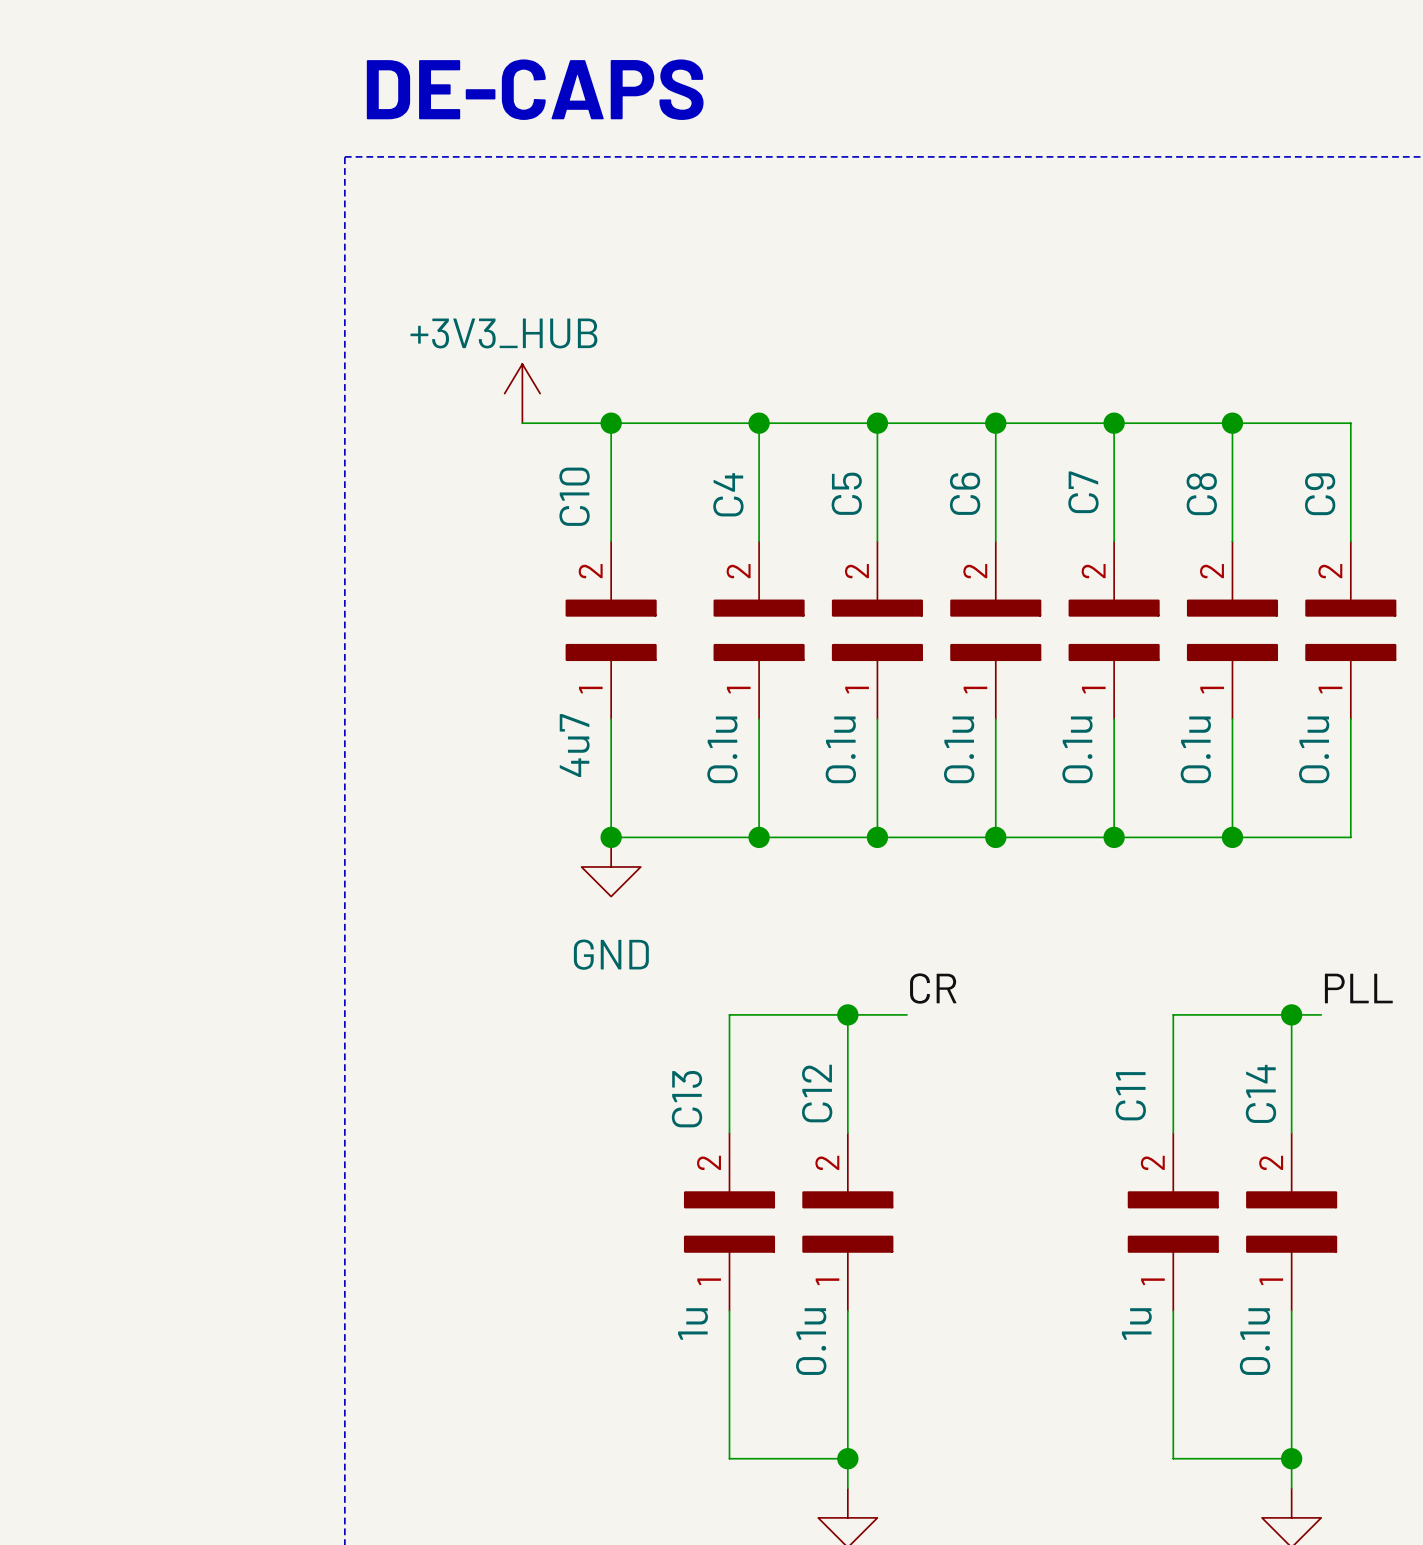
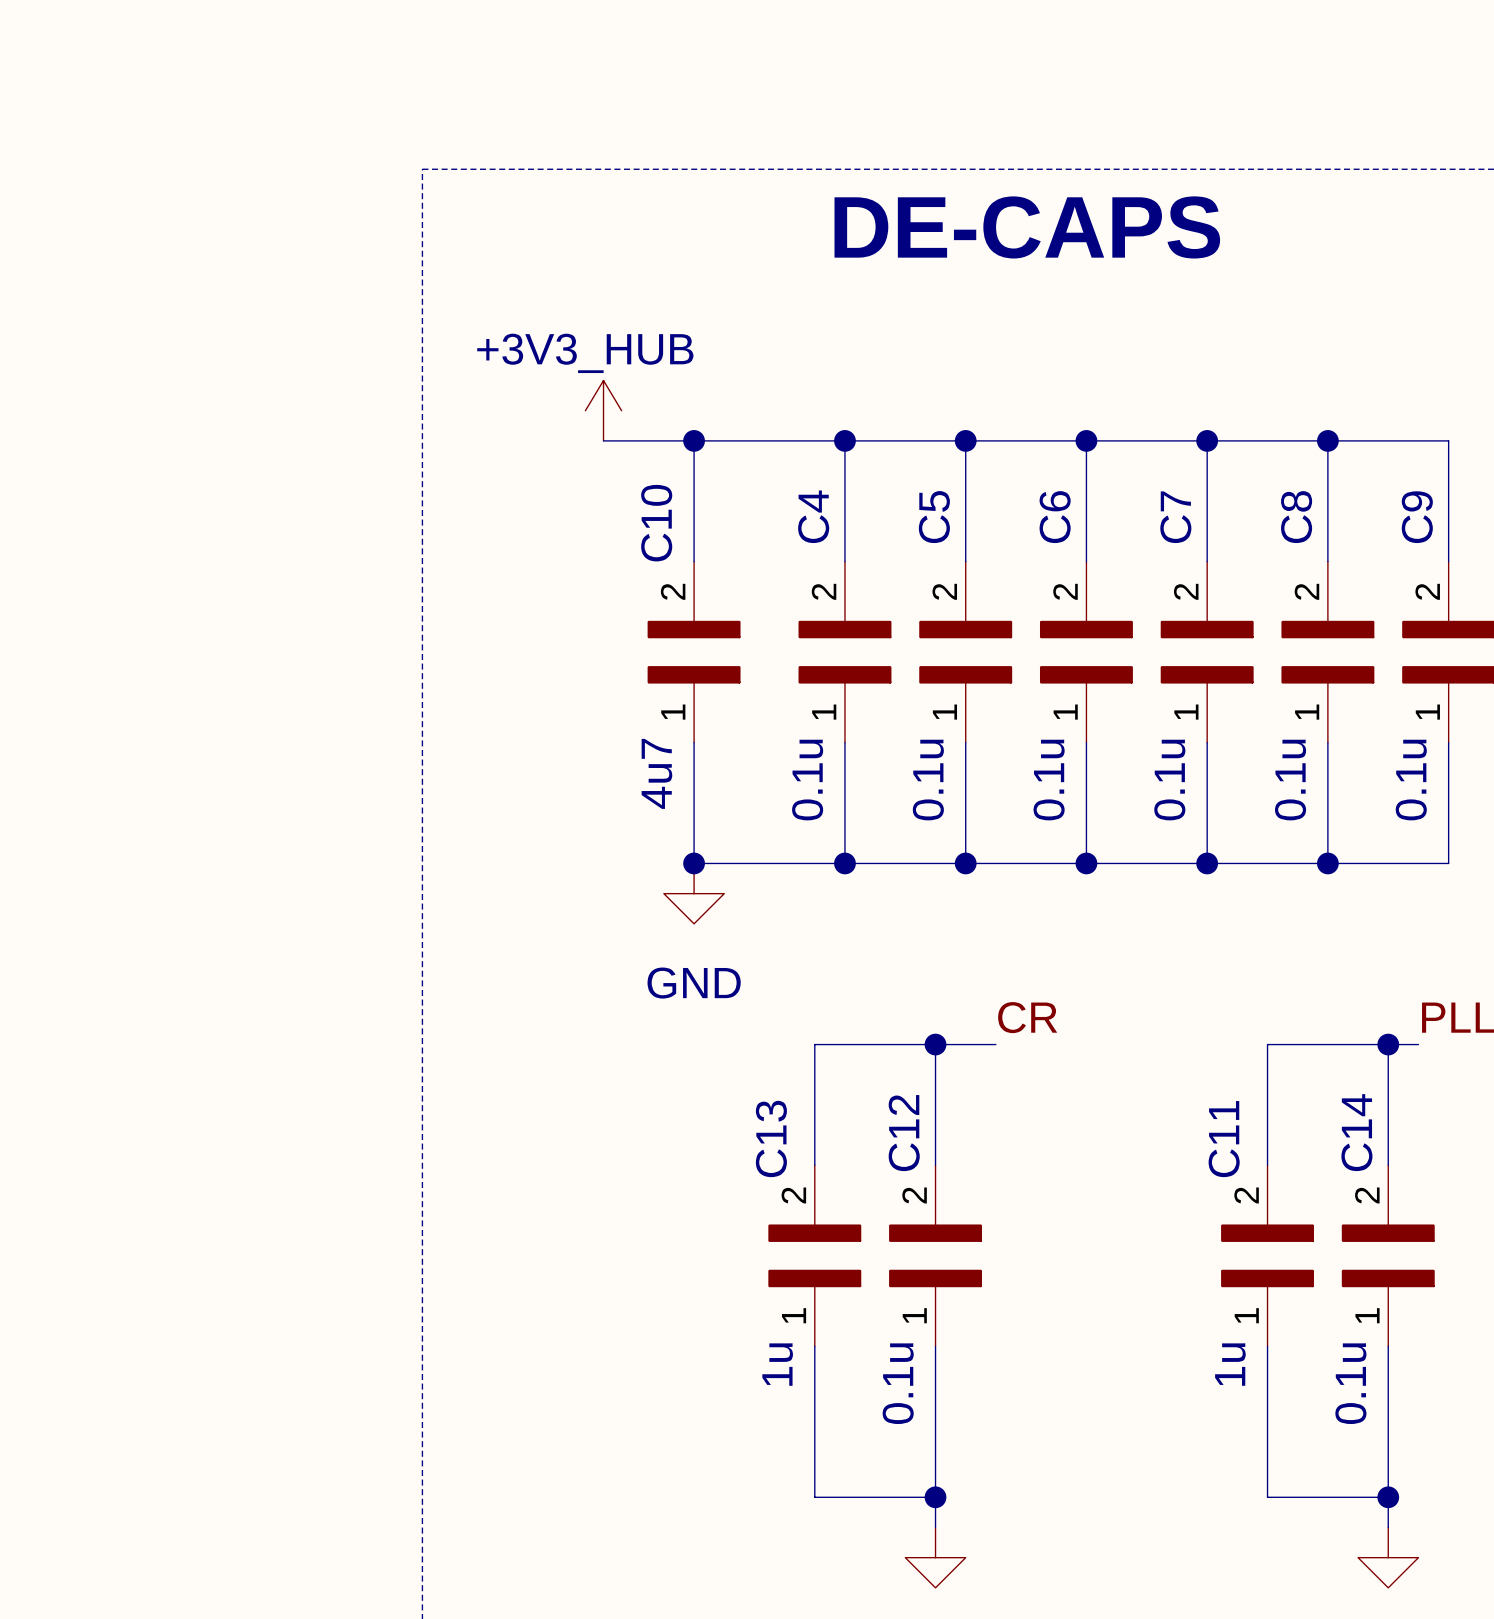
text position: DE-CAPS (535, 89) -> DE-CAPS (1027, 227)

